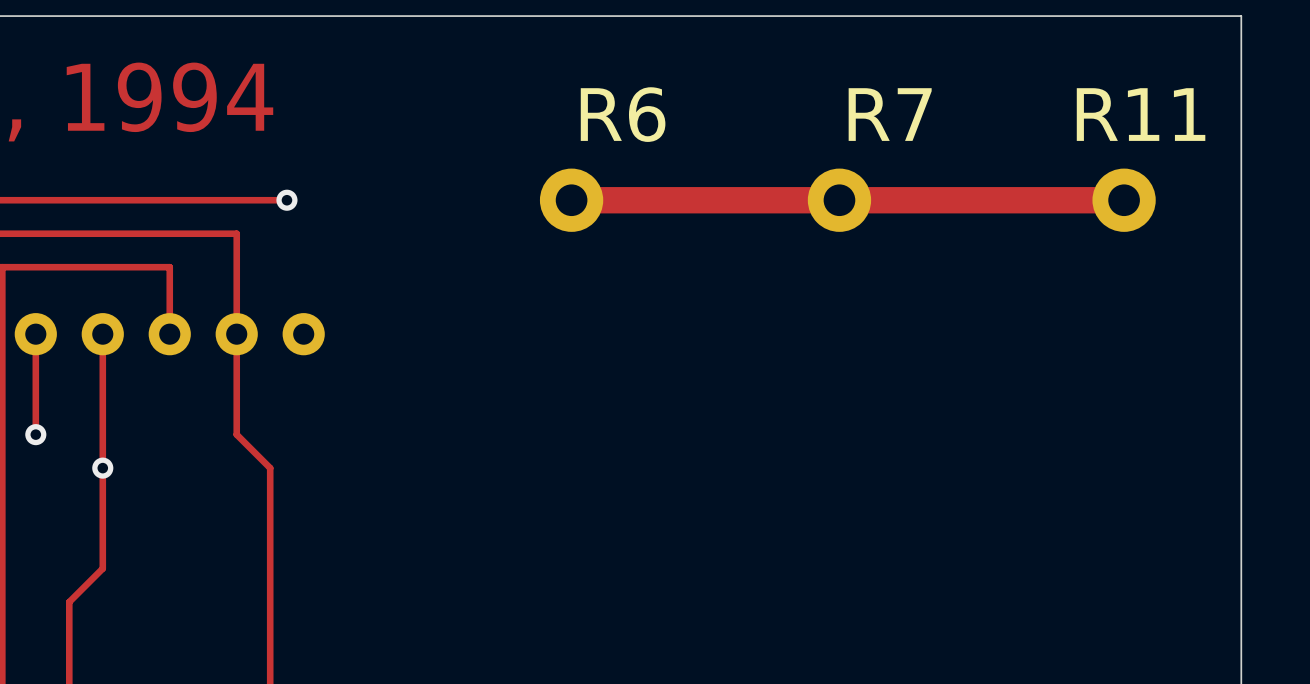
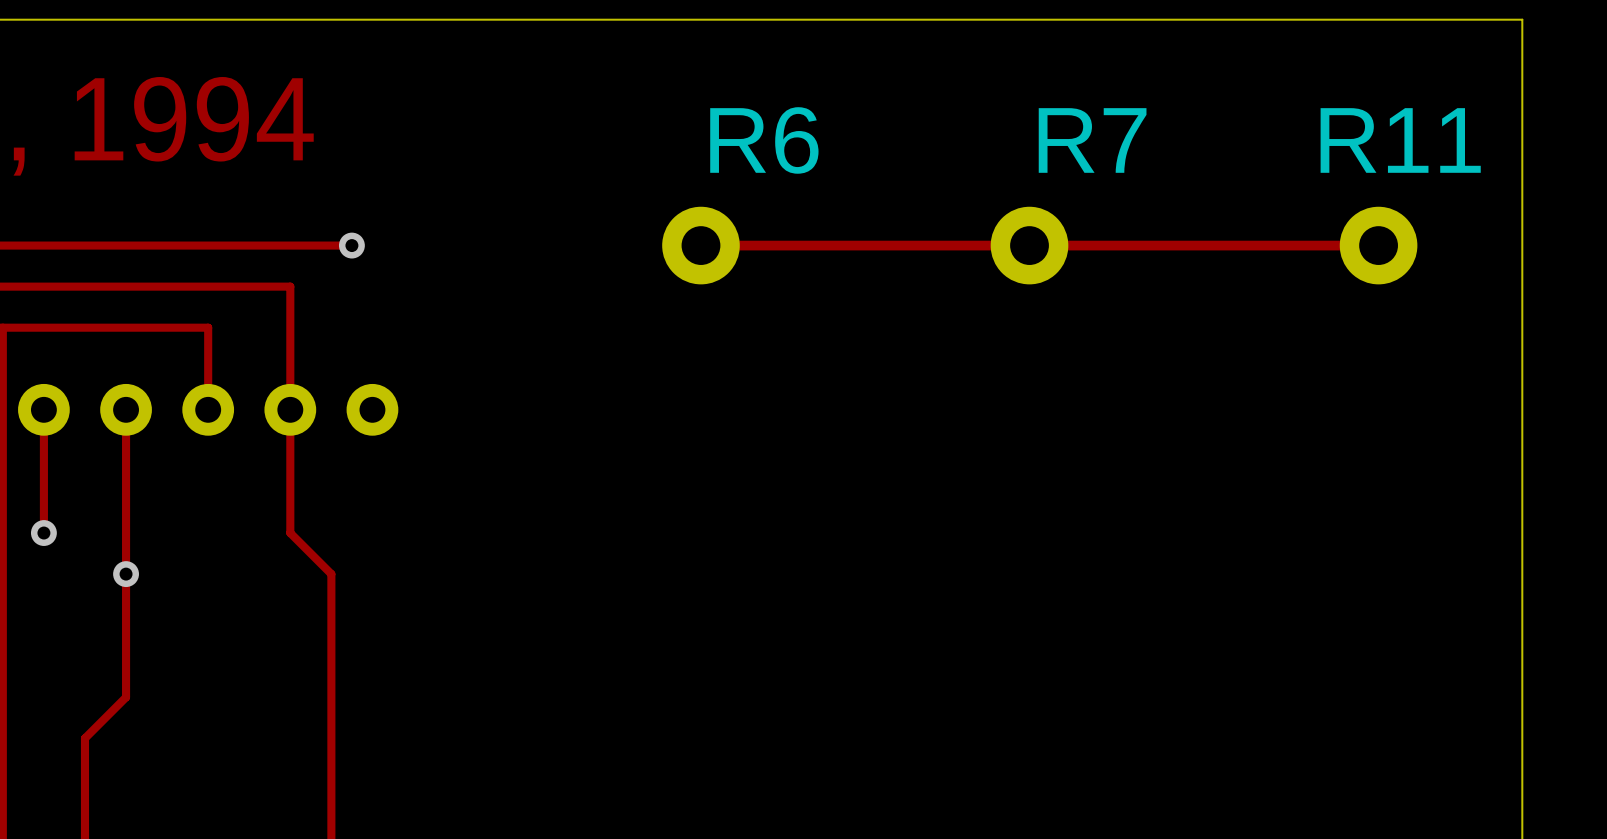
track width: thick (571, 200) (1124, 200) -> thin (700, 245) (1378, 245)

